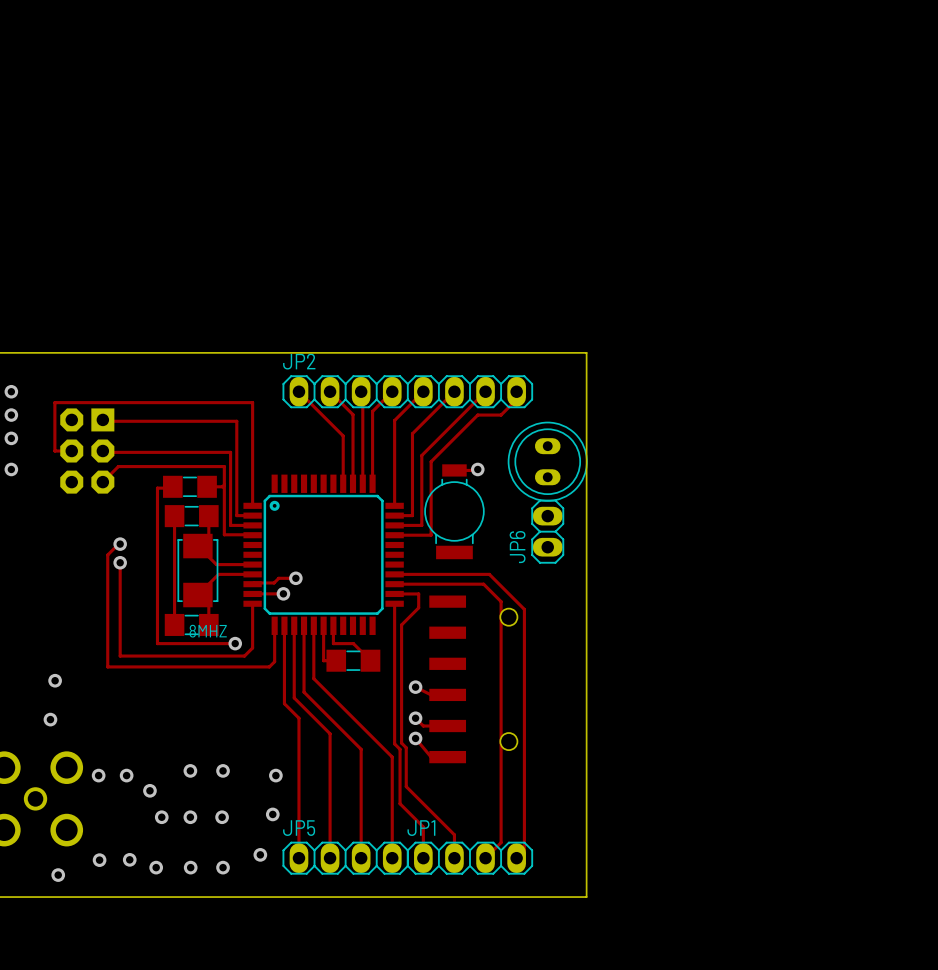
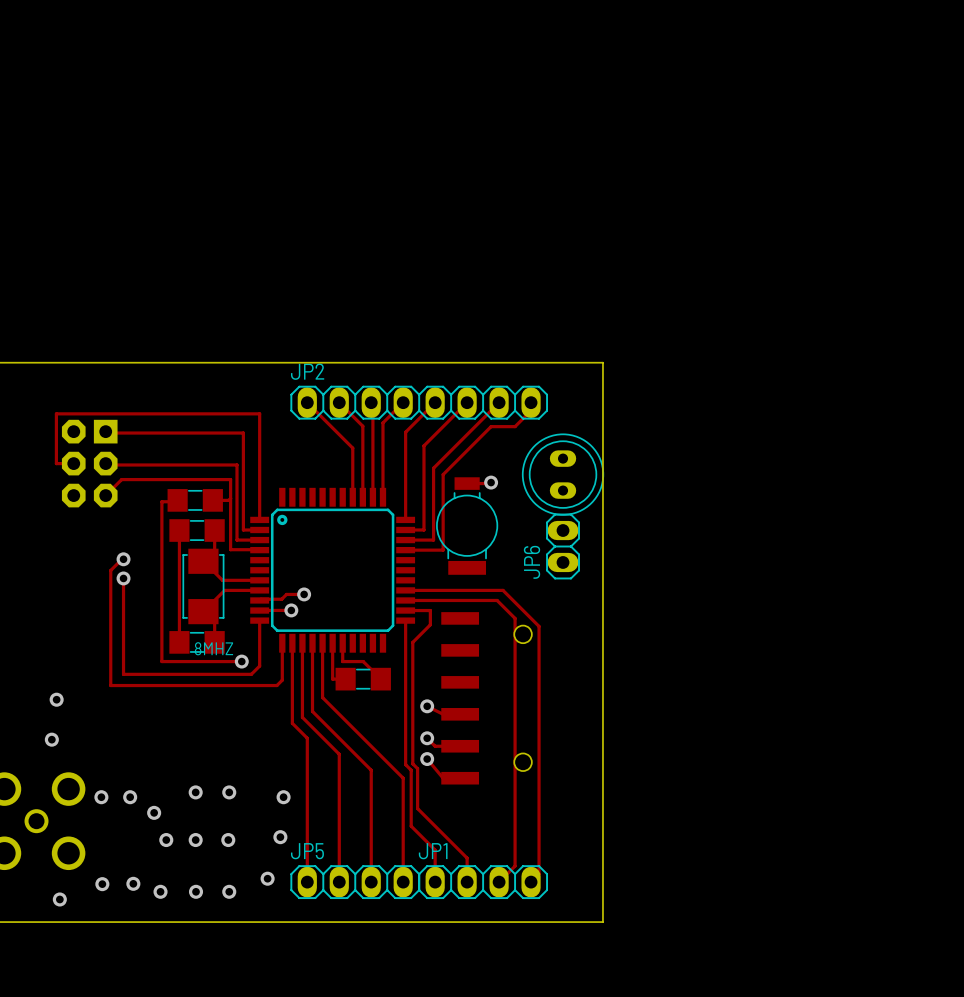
via: (11, 391) -> none
via: (11, 415) -> none
via: (11, 438) -> none
via: (11, 469) -> none

